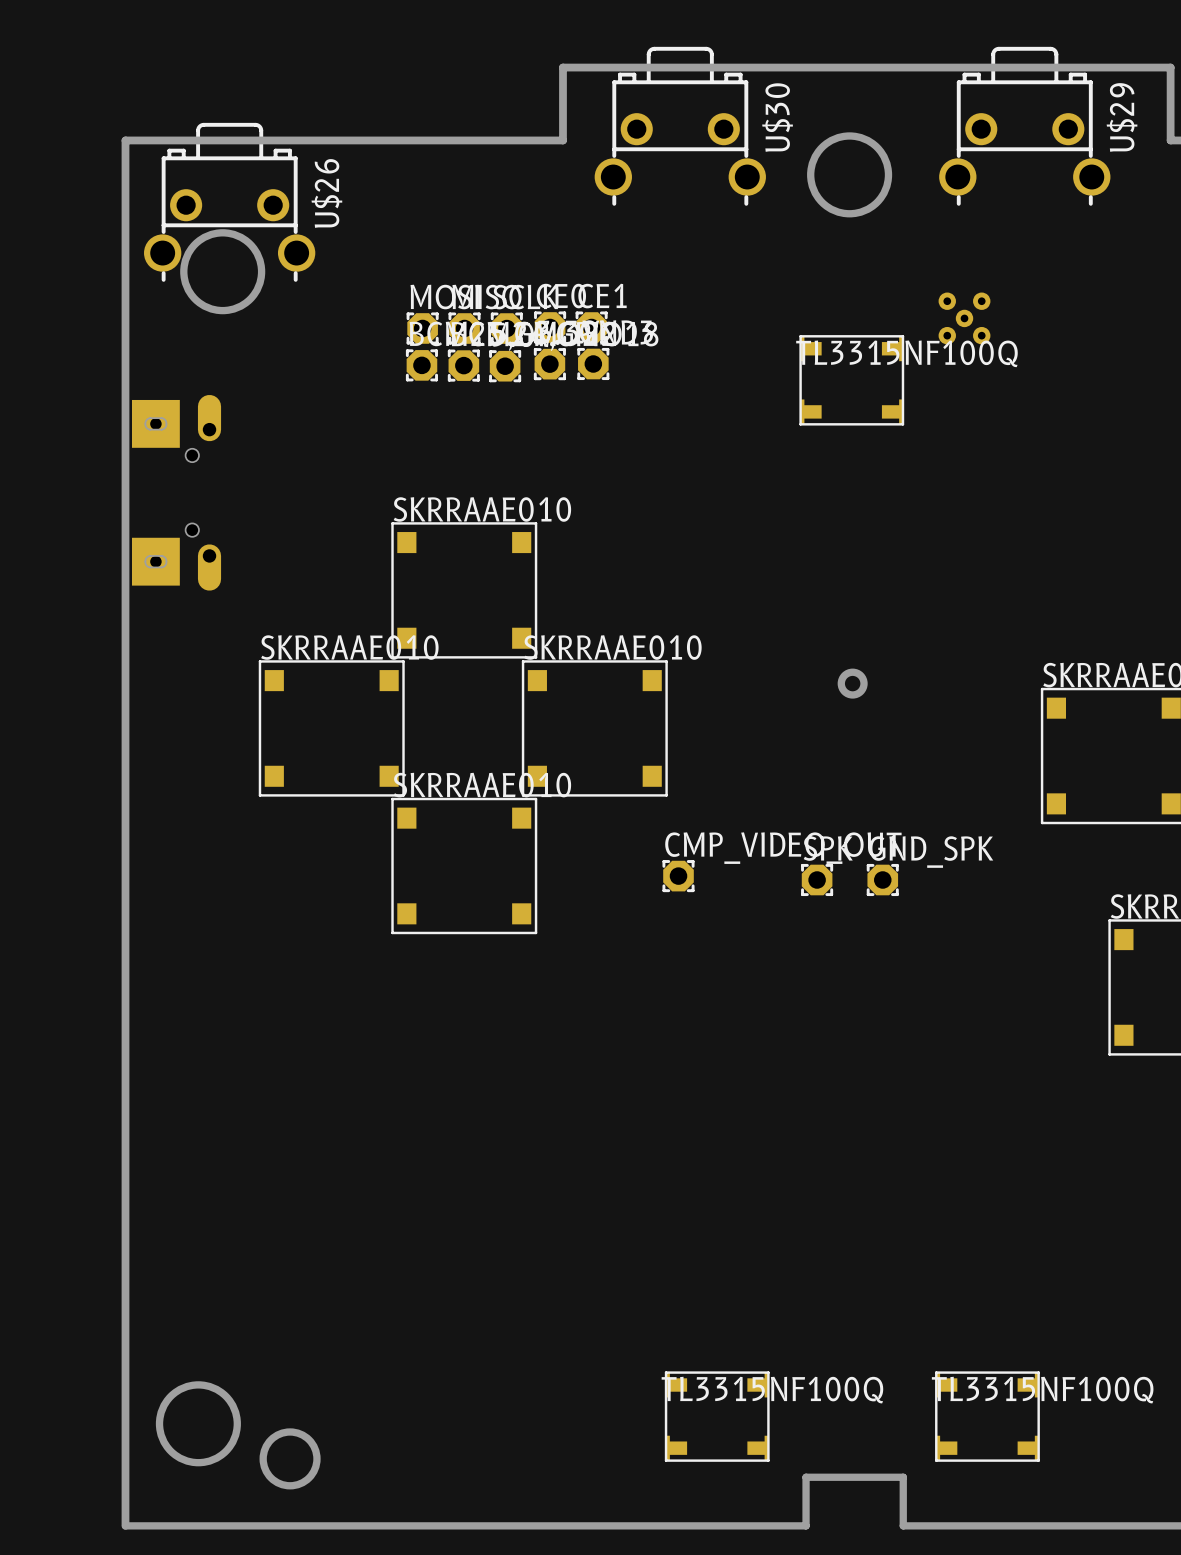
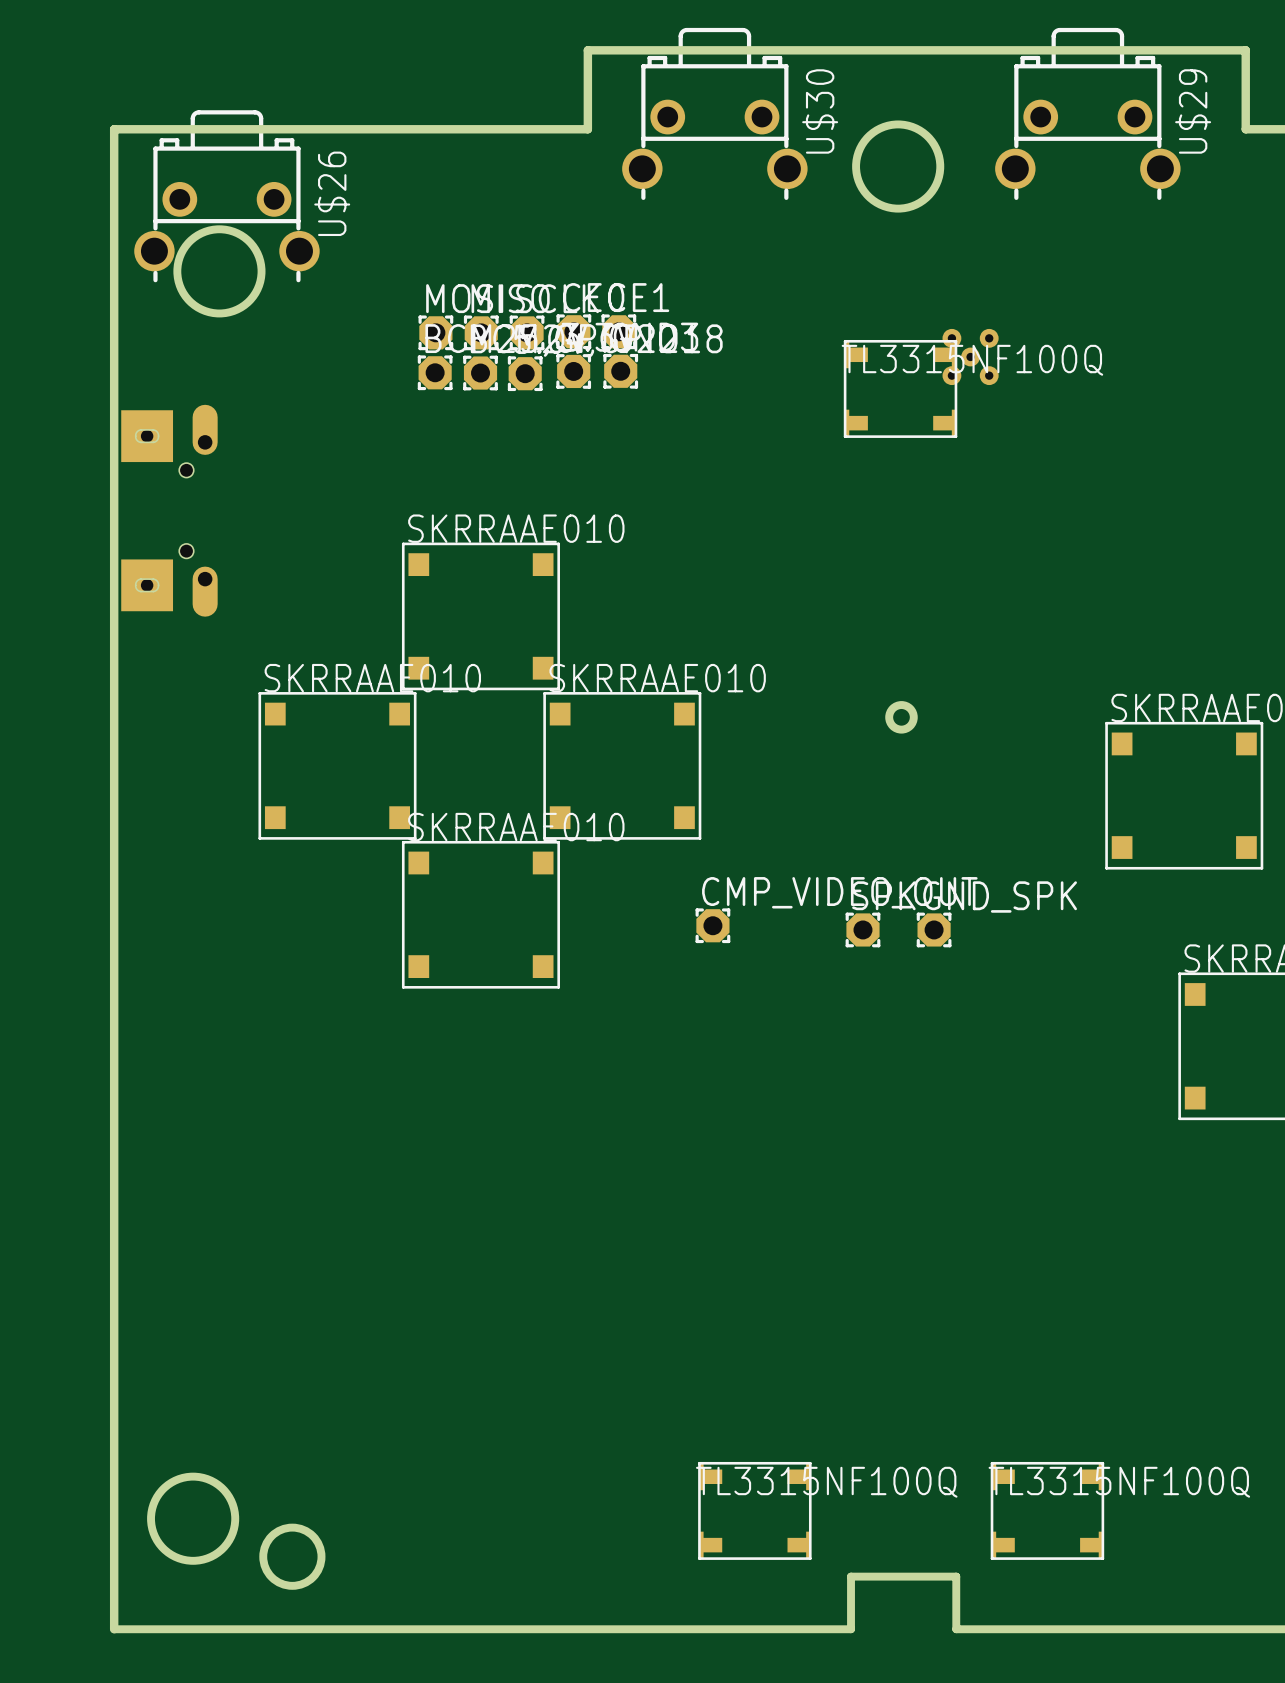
part position: (964, 318) -> (970, 356)

